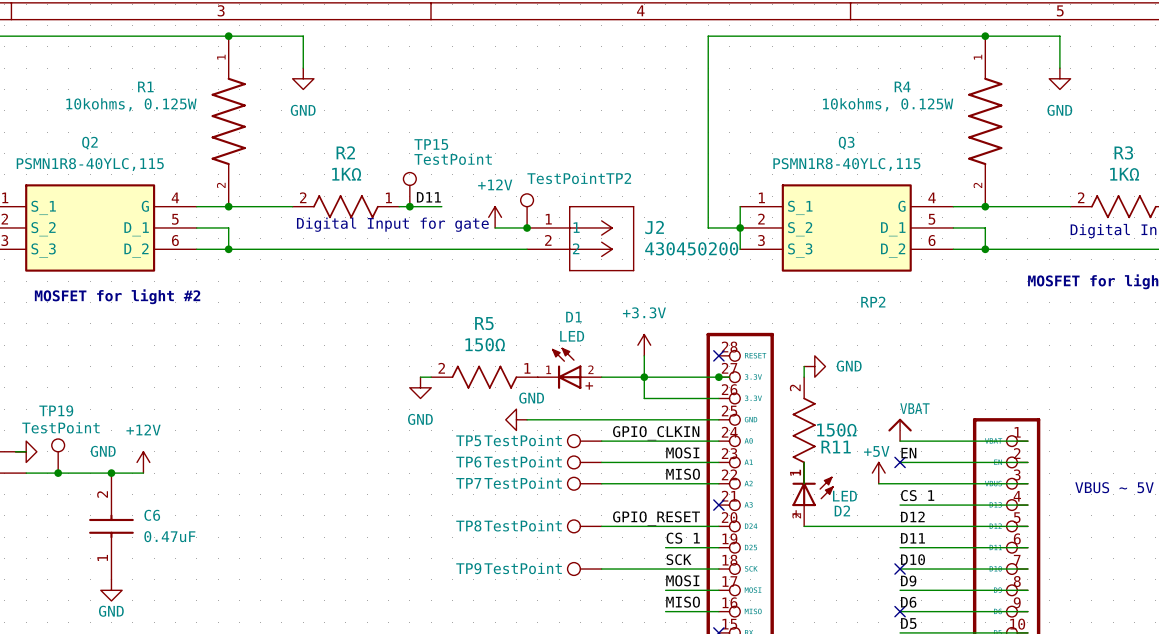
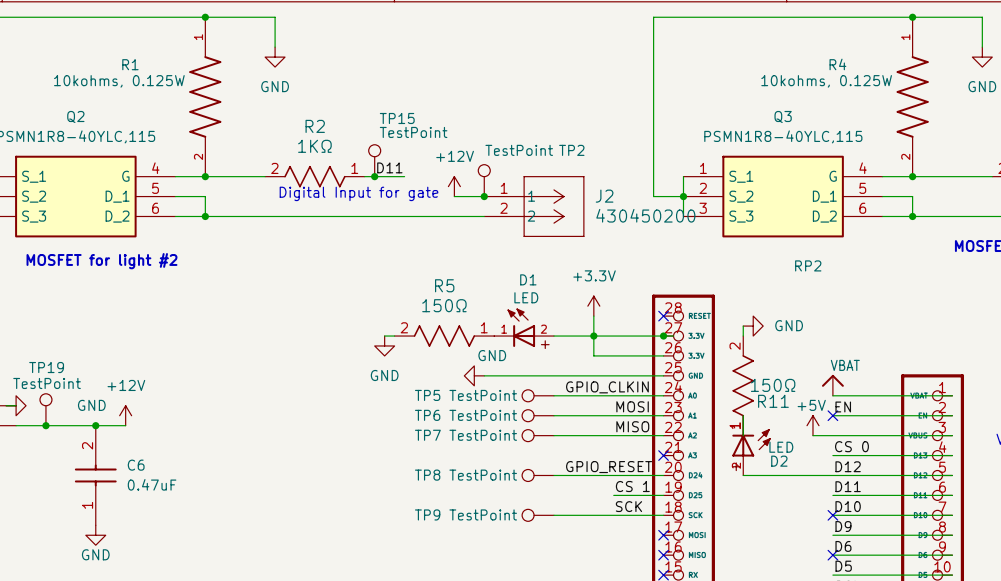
label: CS 1 (917, 495) -> CS 0 (851, 446)
label: MOSI (682, 580) -> none
wire: (665, 590) (718, 590) -> none
no-connect mark: none -> (663, 535)
label: MISO (683, 602) -> none
wire: (665, 611) (718, 611) -> none
no-connect mark: none -> (663, 555)

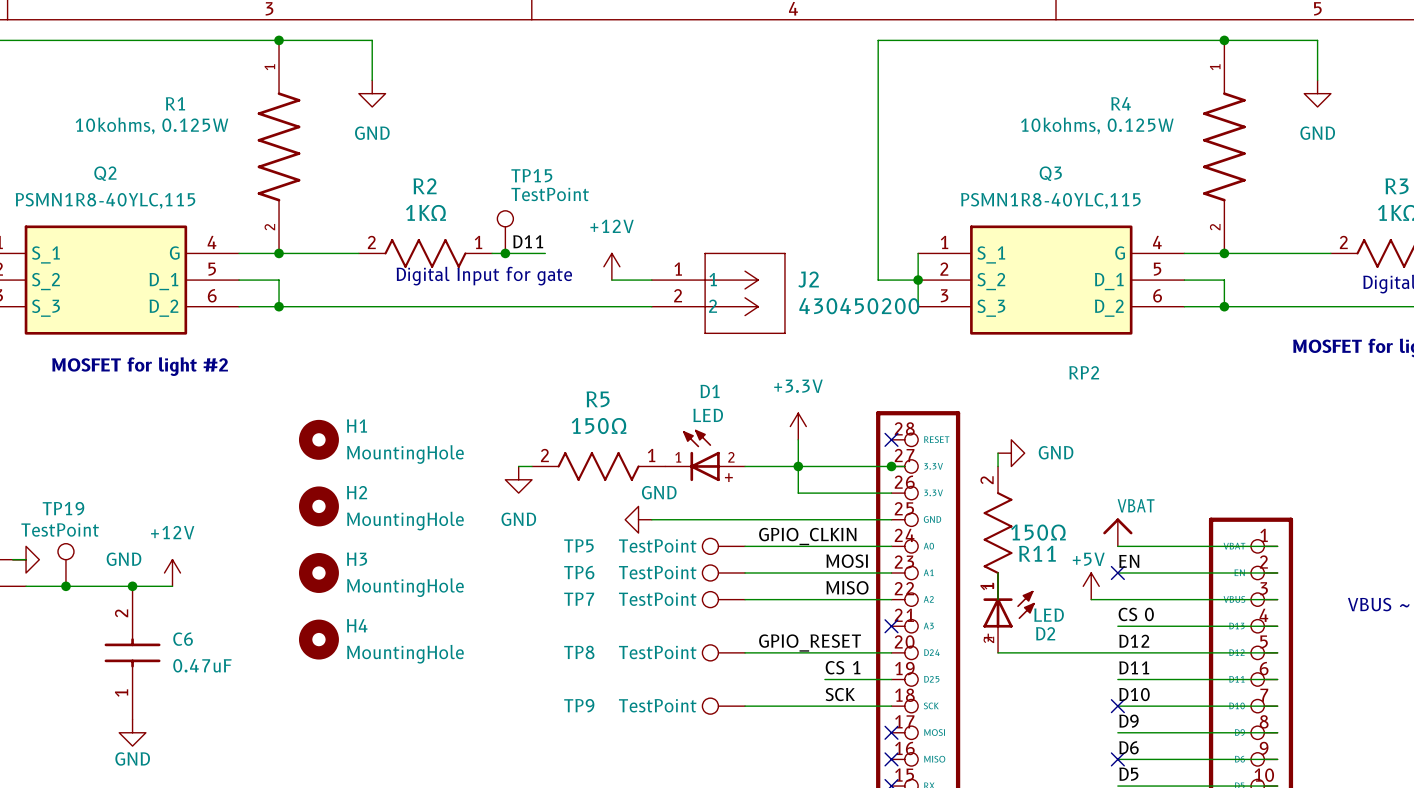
TP2: TestPoint (484, 180) -> none
junction: (484, 196) -> none
H1: none -> MountingHole (318, 439)
H2: none -> MountingHole (318, 506)
H3: none -> MountingHole (318, 572)
H4: none -> MountingHole (318, 639)

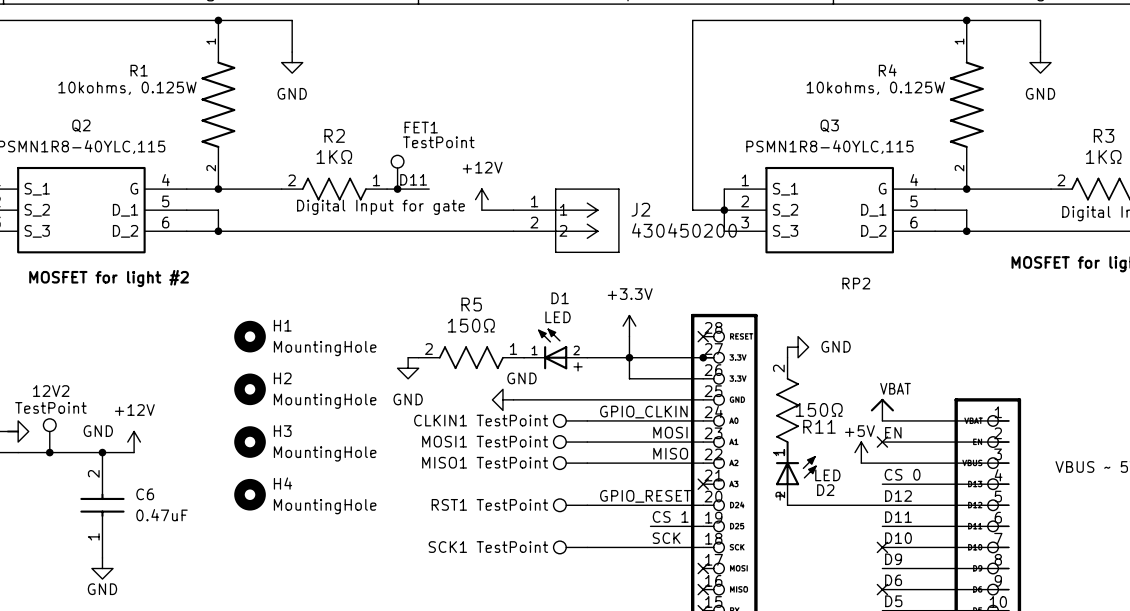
TP15 name: TP15 (531, 175) -> FET1 (421, 127)
TP19 name: TP19 (63, 508) -> 12V2 (51, 391)
TP5 name: TP5 (578, 545) -> CLKIN1 (440, 420)
TP6 name: TP6 (579, 572) -> MOSI1 (444, 441)
TP7 name: TP7 (579, 599) -> MISO1 (444, 462)
TP8 name: TP8 (579, 652) -> RST1 (449, 504)
TP9 name: TP9 (579, 705) -> SCK1 (447, 547)

